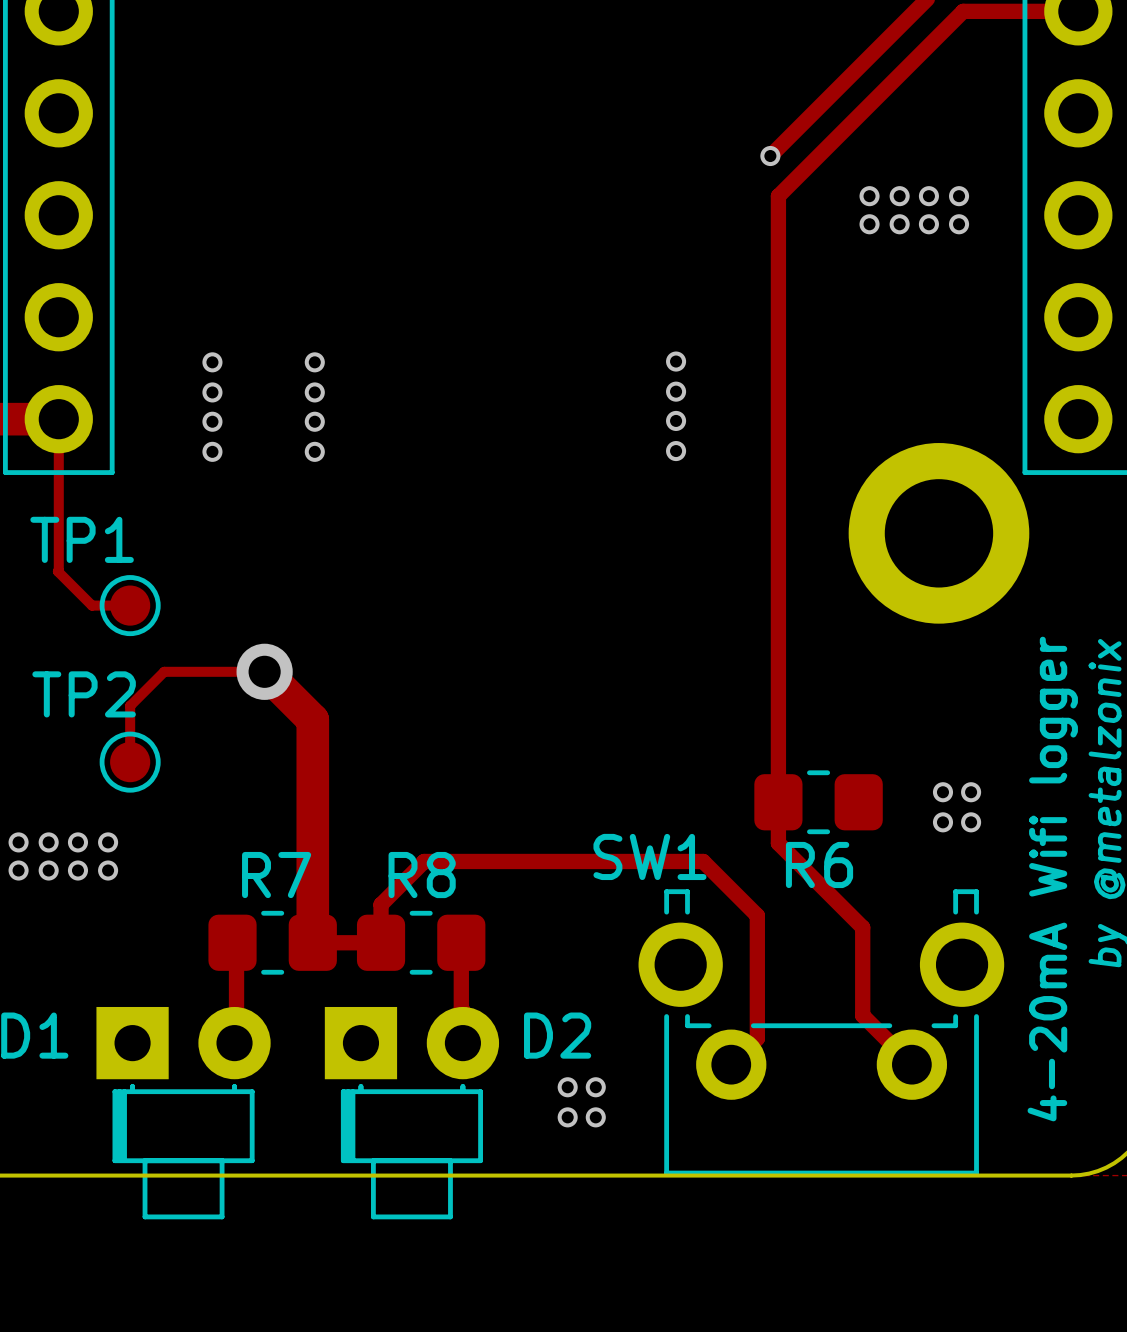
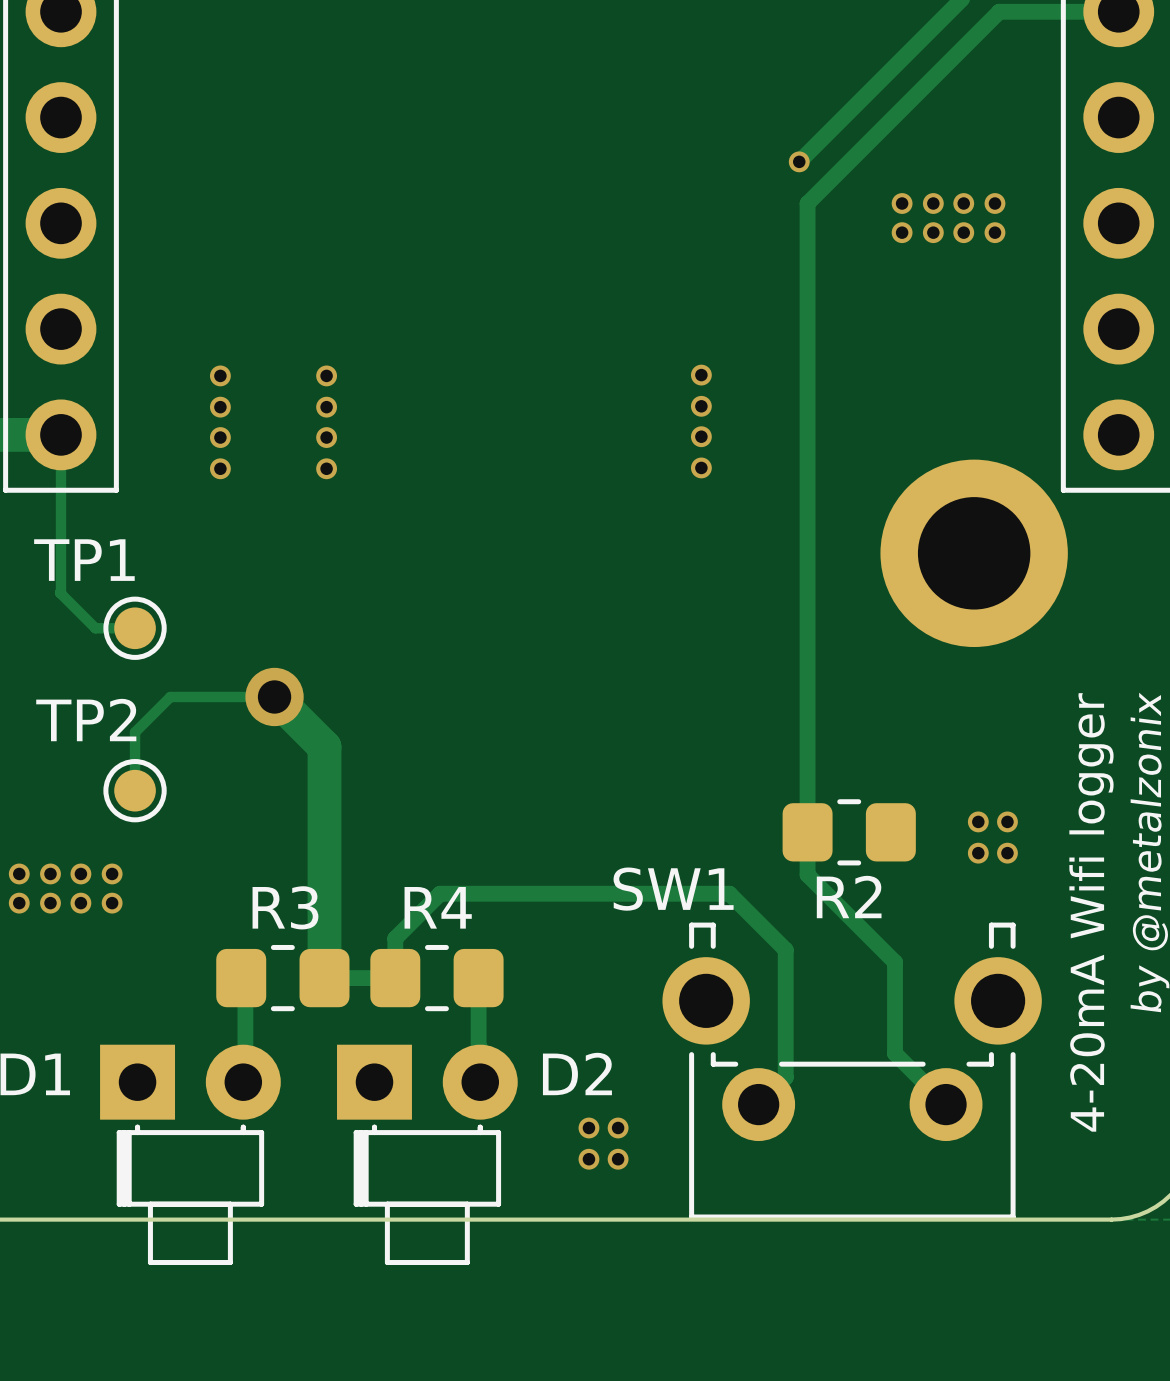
R6 name: R6 (819, 864) -> R2 (849, 897)
R7 name: R7 (276, 875) -> R3 (285, 907)
R8 name: R8 (422, 875) -> R4 (438, 907)

